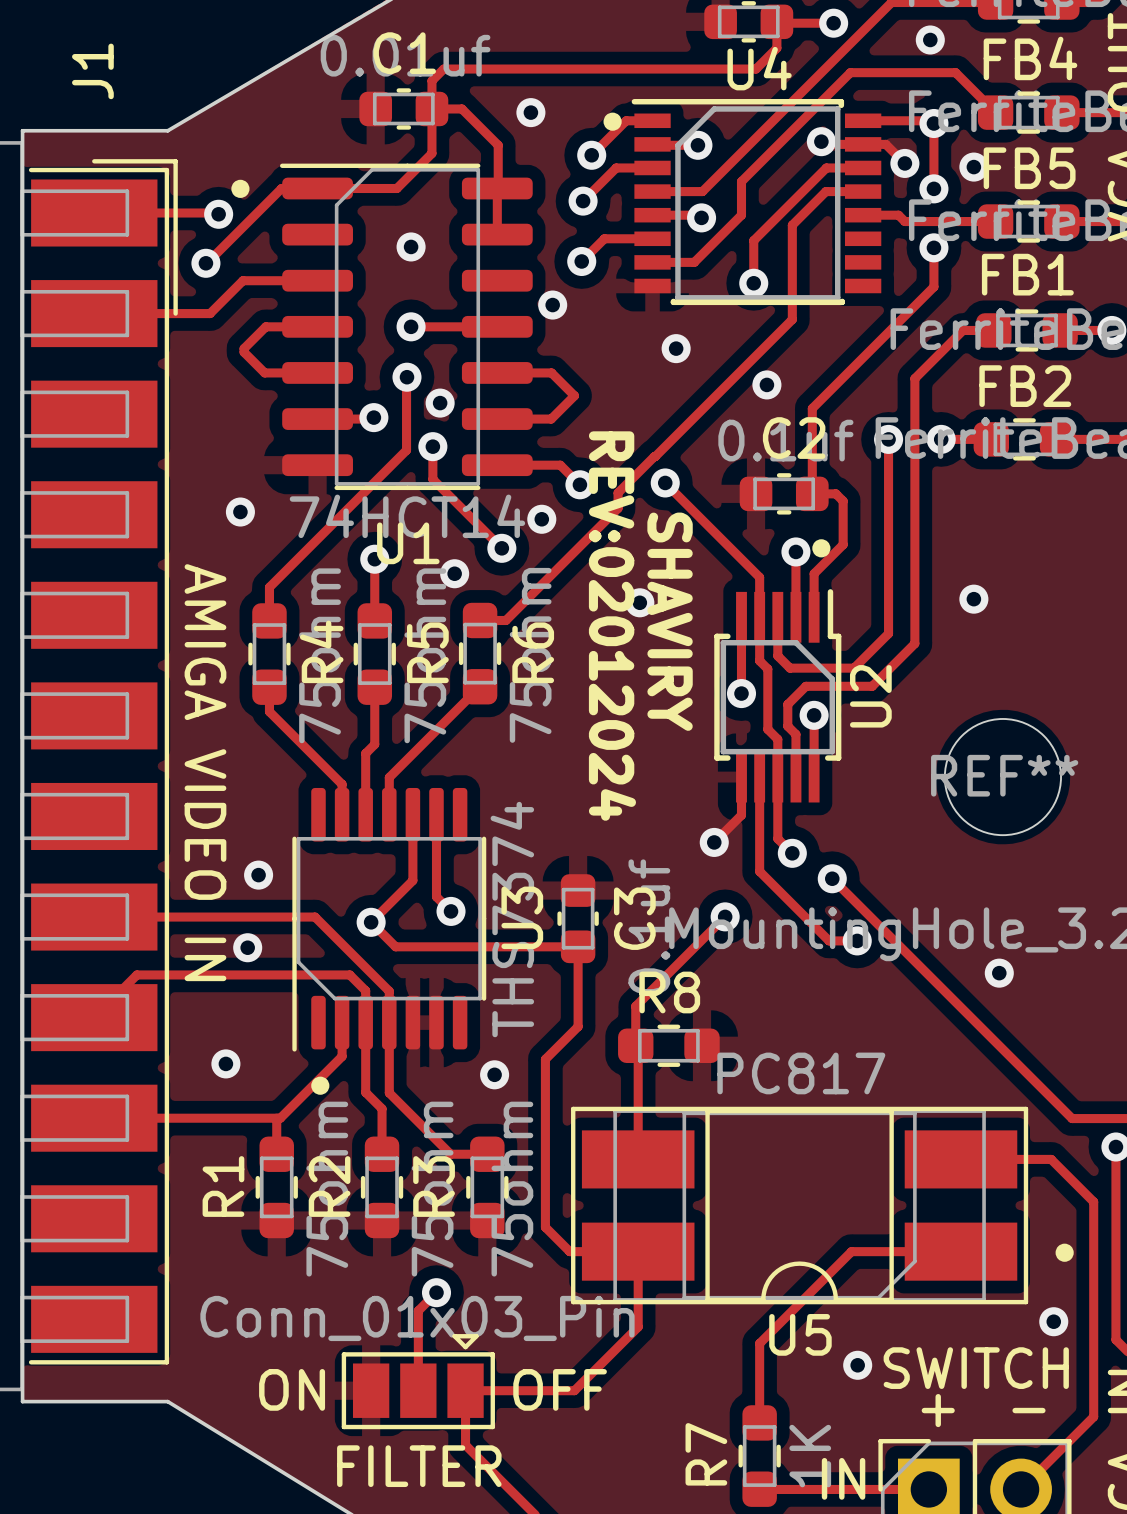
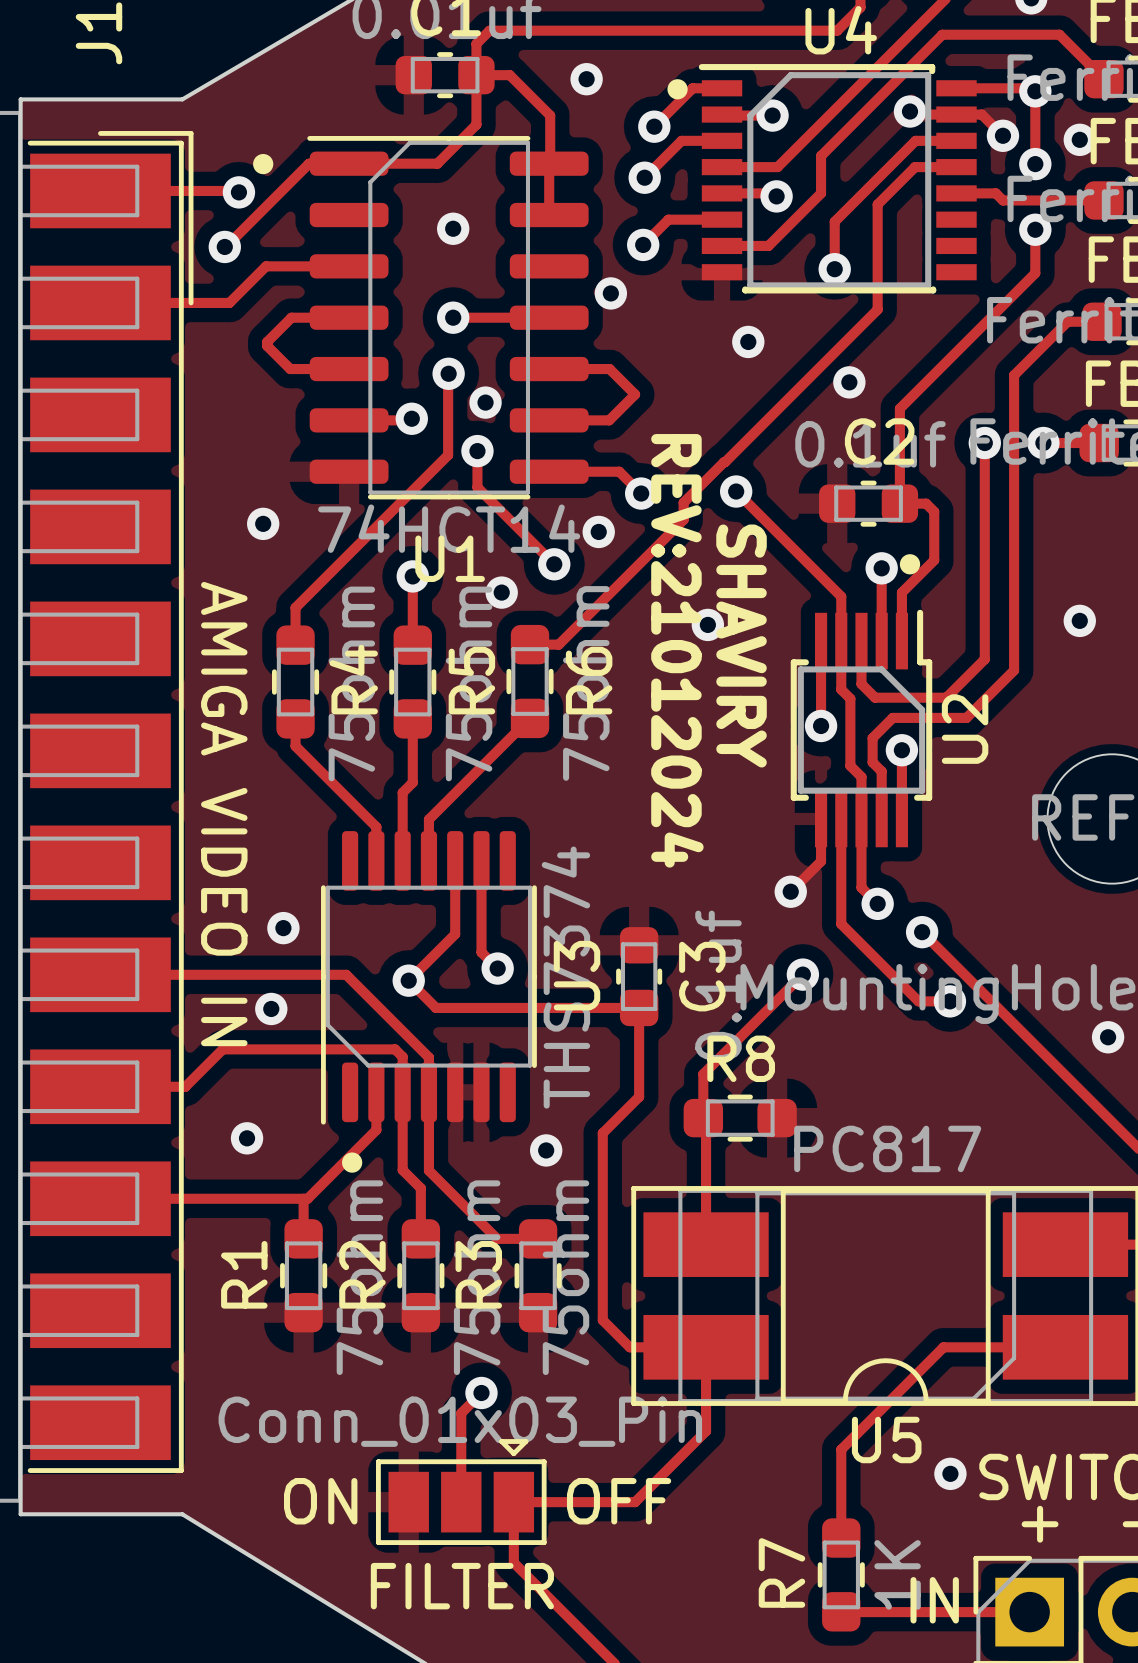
text: REV:02012024 (612, 626) -> REV:21012024 (677, 650)
track: (358, 984) (349, 974) (136, 974) (94, 1017) -> (395, 1049) (222, 1049) (185, 1086) (100, 1086)

